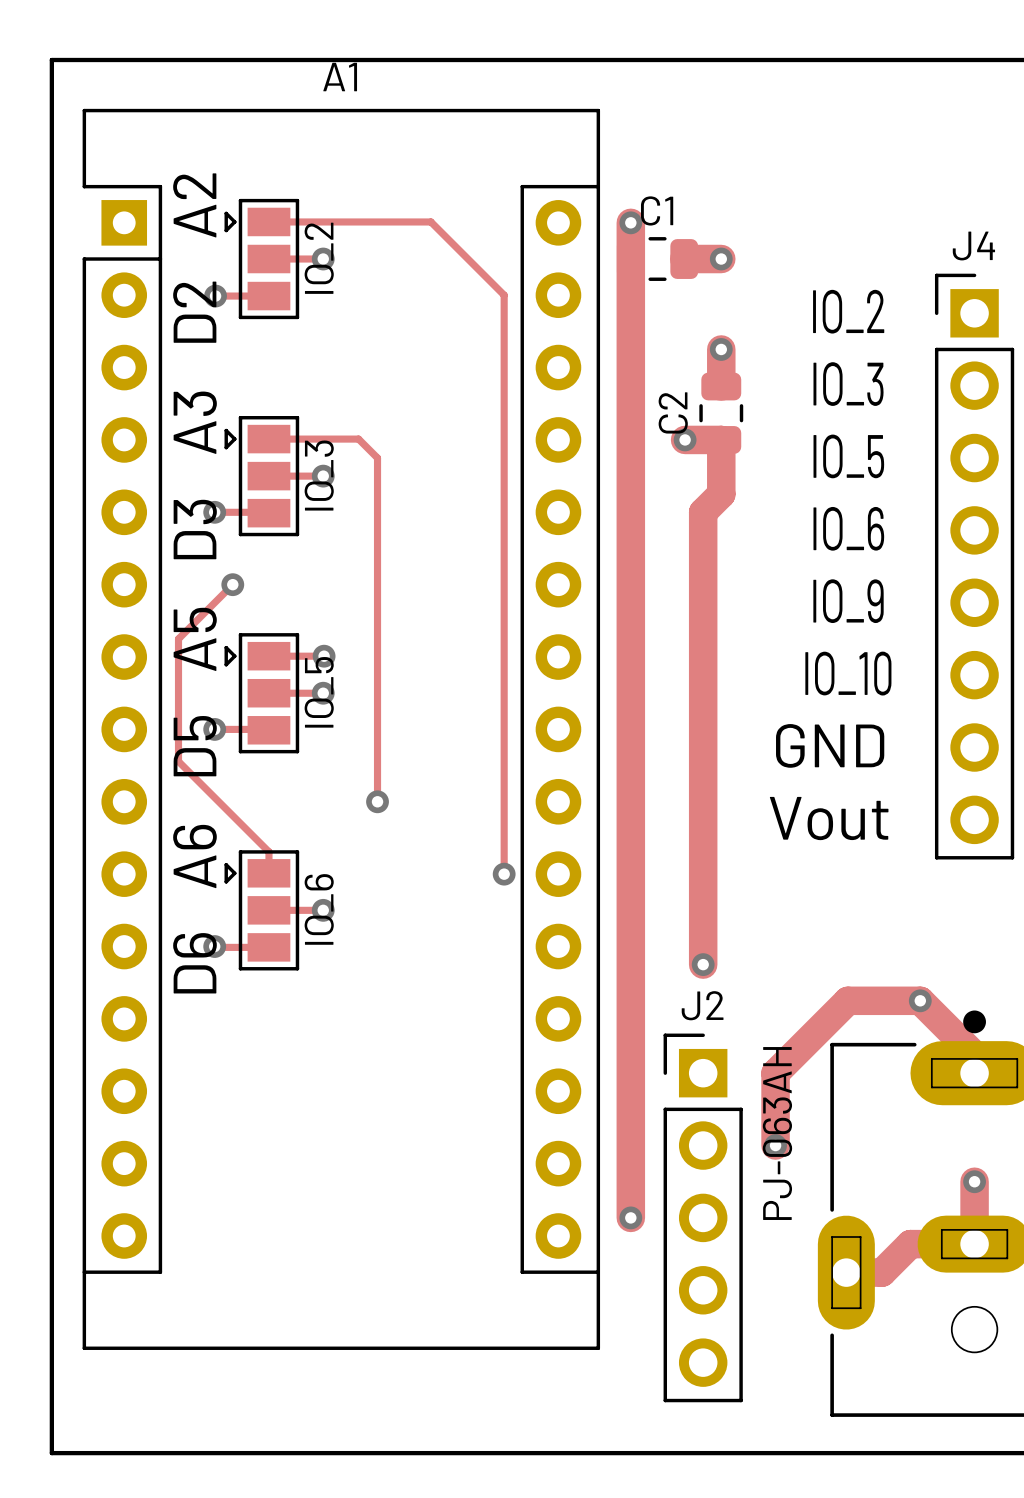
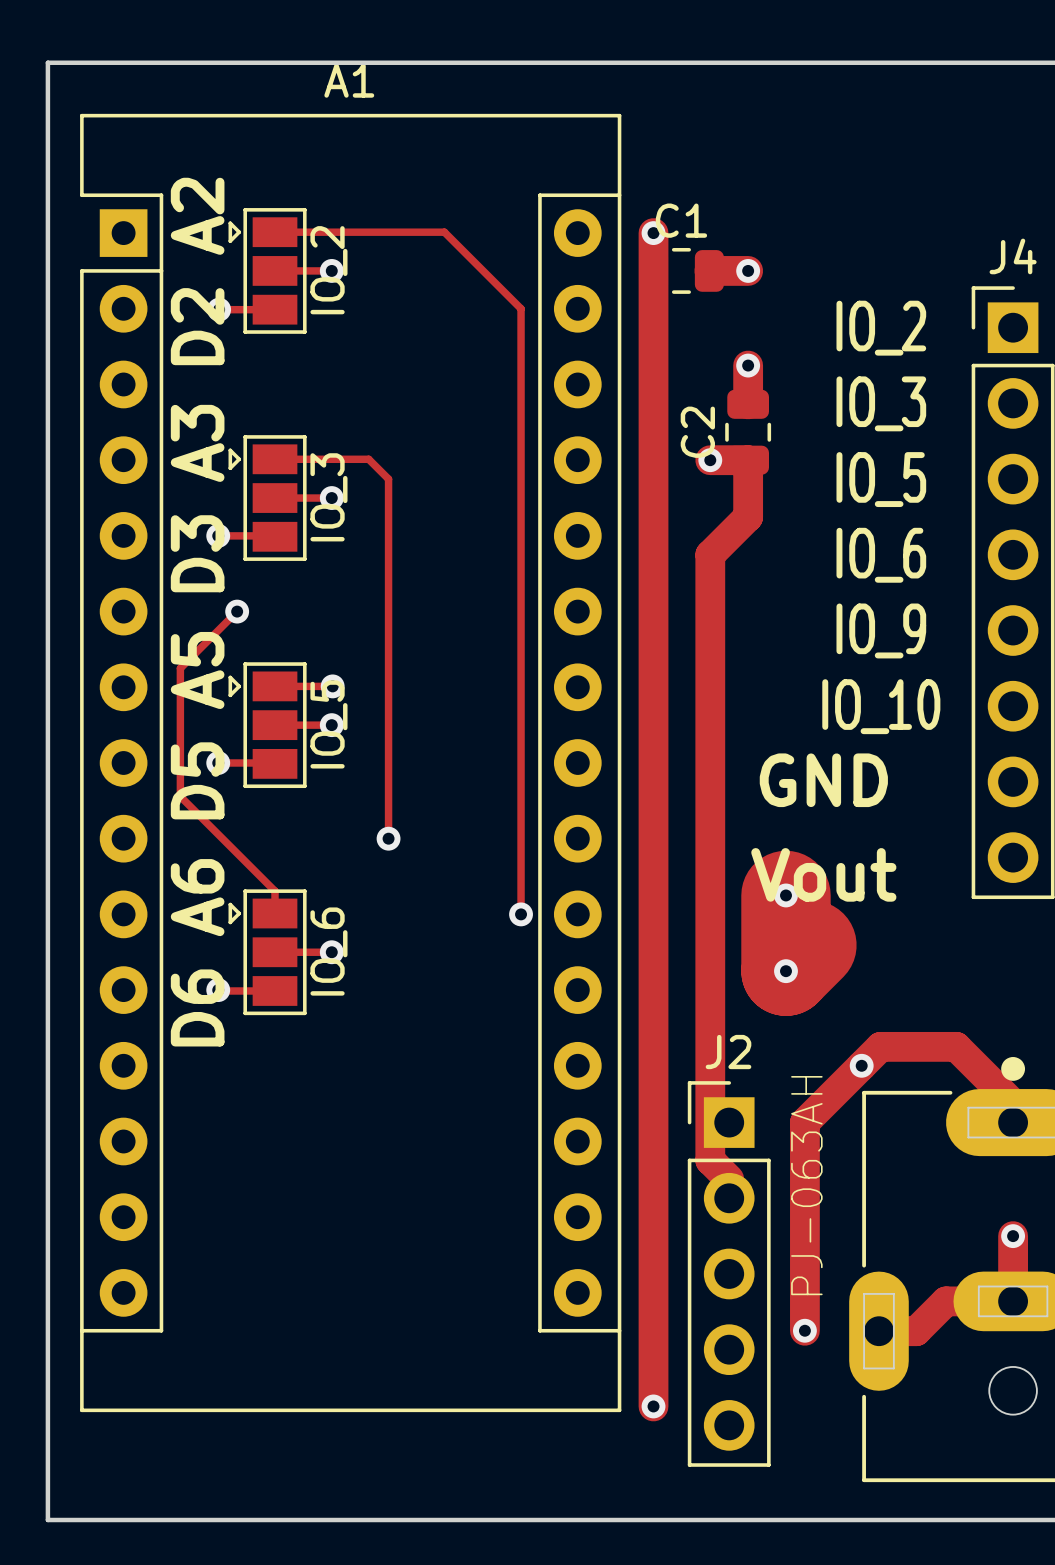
track: (703, 512) (703, 964) -> (729, 535) (710, 554) (710, 1160) (729, 1179)
text position: GND (830, 745) -> GND (823, 780)
text position: Vout (829, 818) -> Vout (823, 874)
track: none -> (785, 895) (785, 971) (811, 945)
via: none -> (785, 895)
via: none -> (785, 971)
via: (703, 964) -> none
via: (920, 1000) -> none
via: none -> (861, 1065)
track: none -> (804, 1198) (804, 1330)
via: (775, 1145) -> none
track: none -> (653, 1273) (653, 1406)
via: (630, 1217) -> none
via: none -> (804, 1330)
via: none -> (653, 1406)

